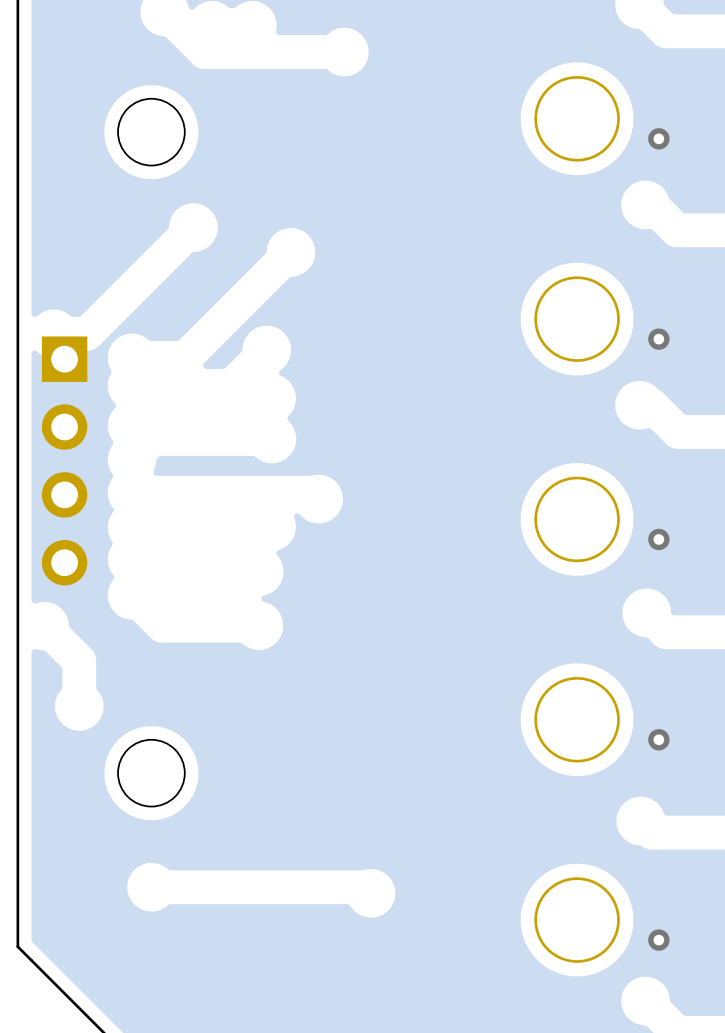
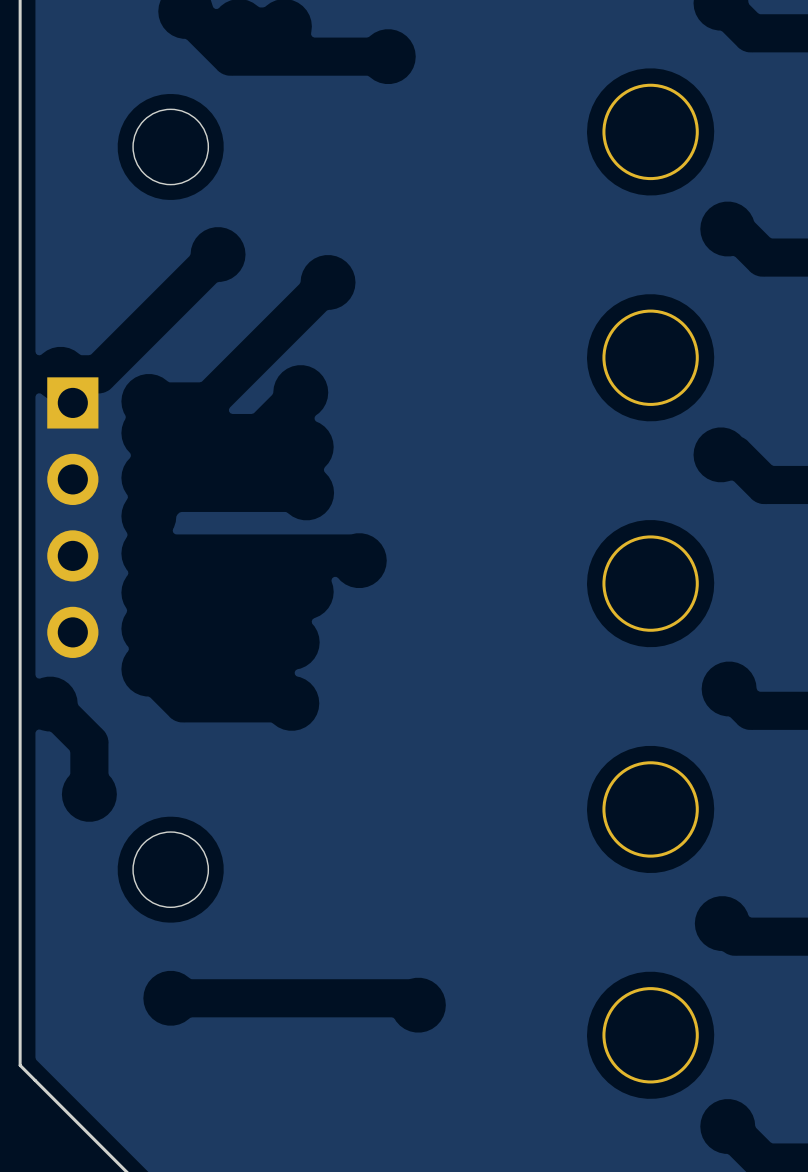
via: (658, 138) -> none
via: (658, 339) -> none
via: (658, 539) -> none
via: (658, 739) -> none
via: (658, 940) -> none

